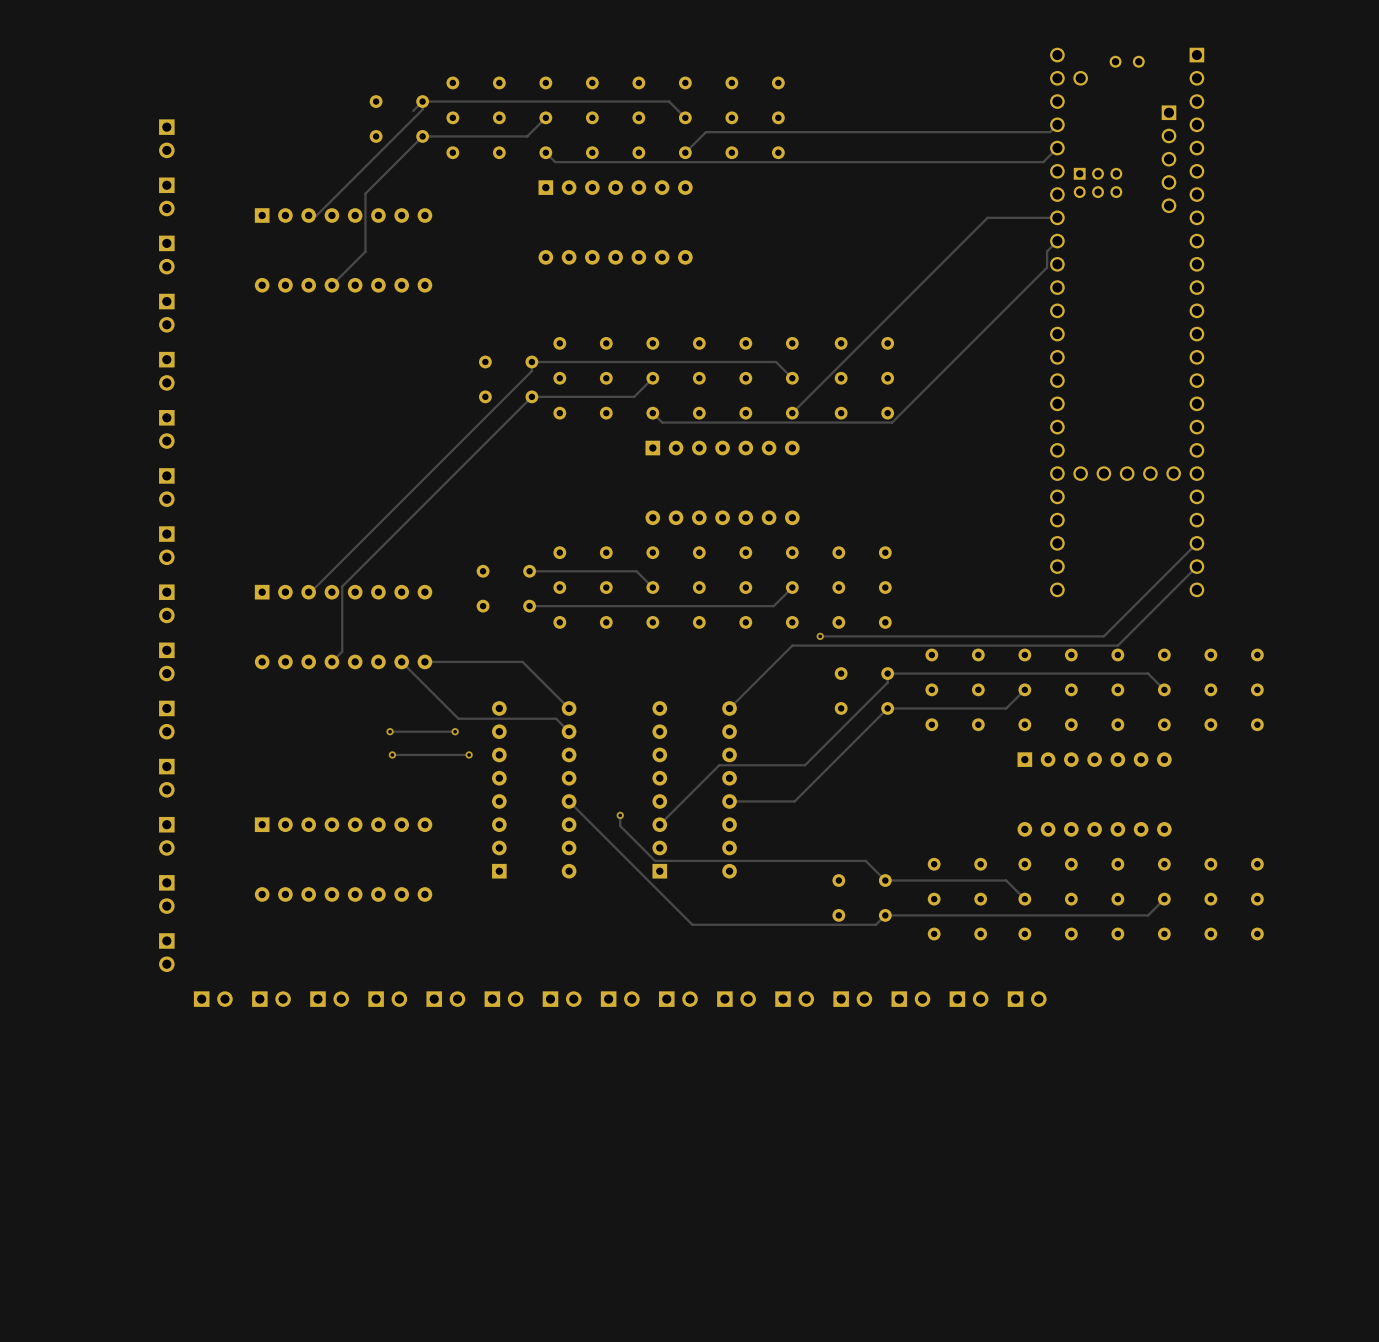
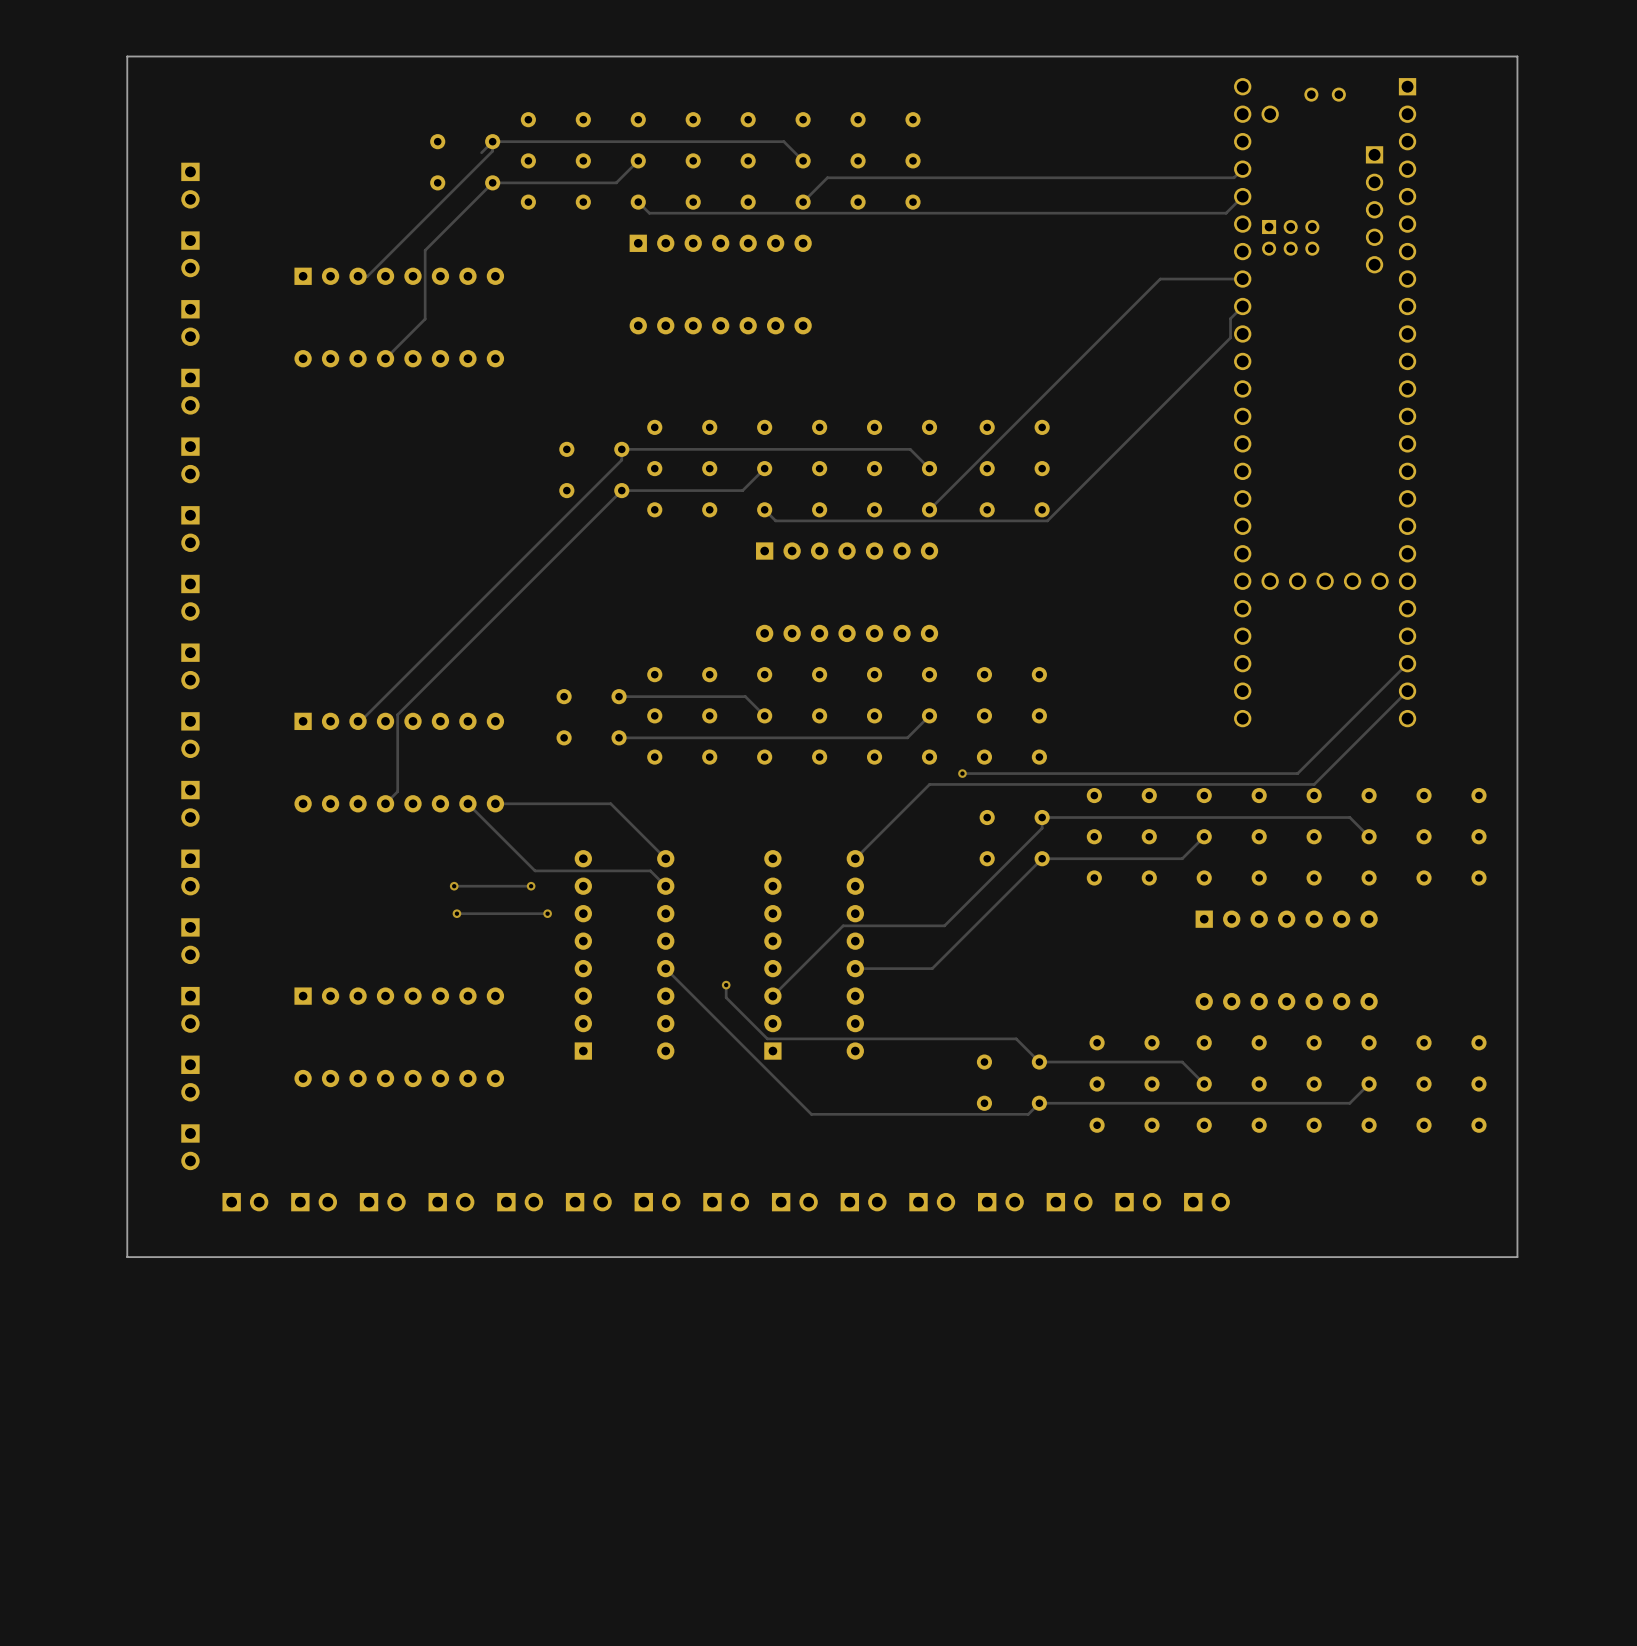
board edge: none -> (1517, 56) (1517, 1257) (127, 1257) (127, 56) (1517, 56)

